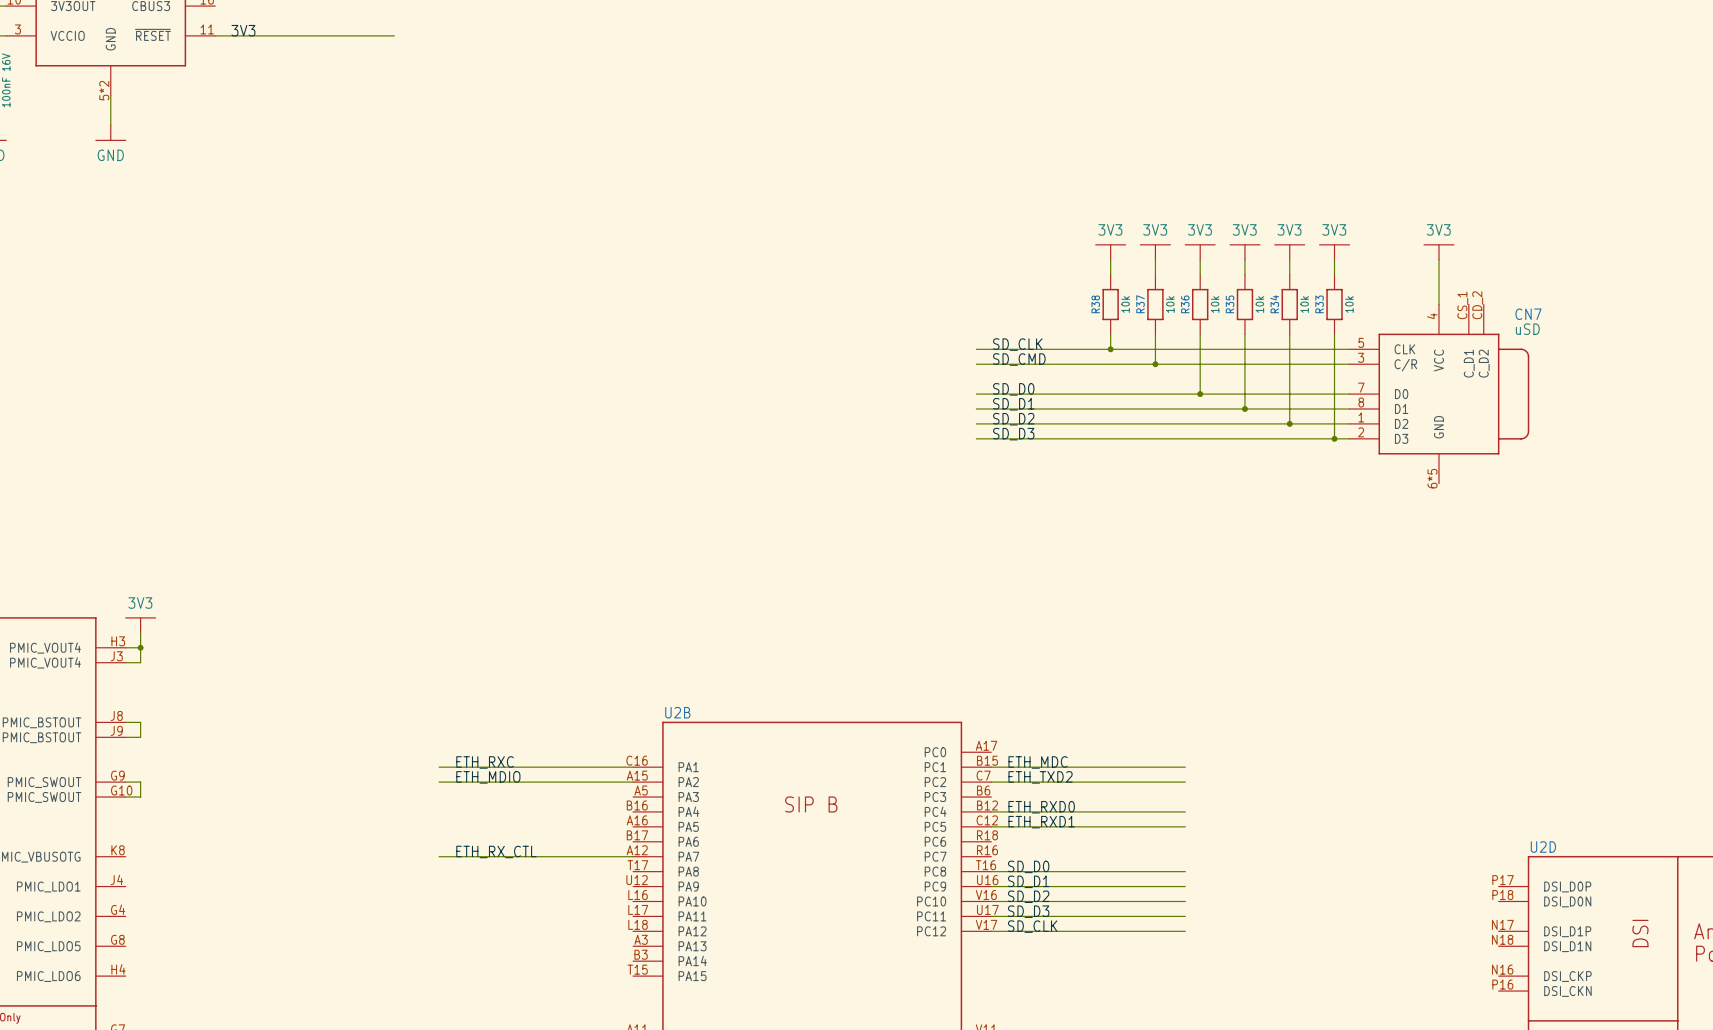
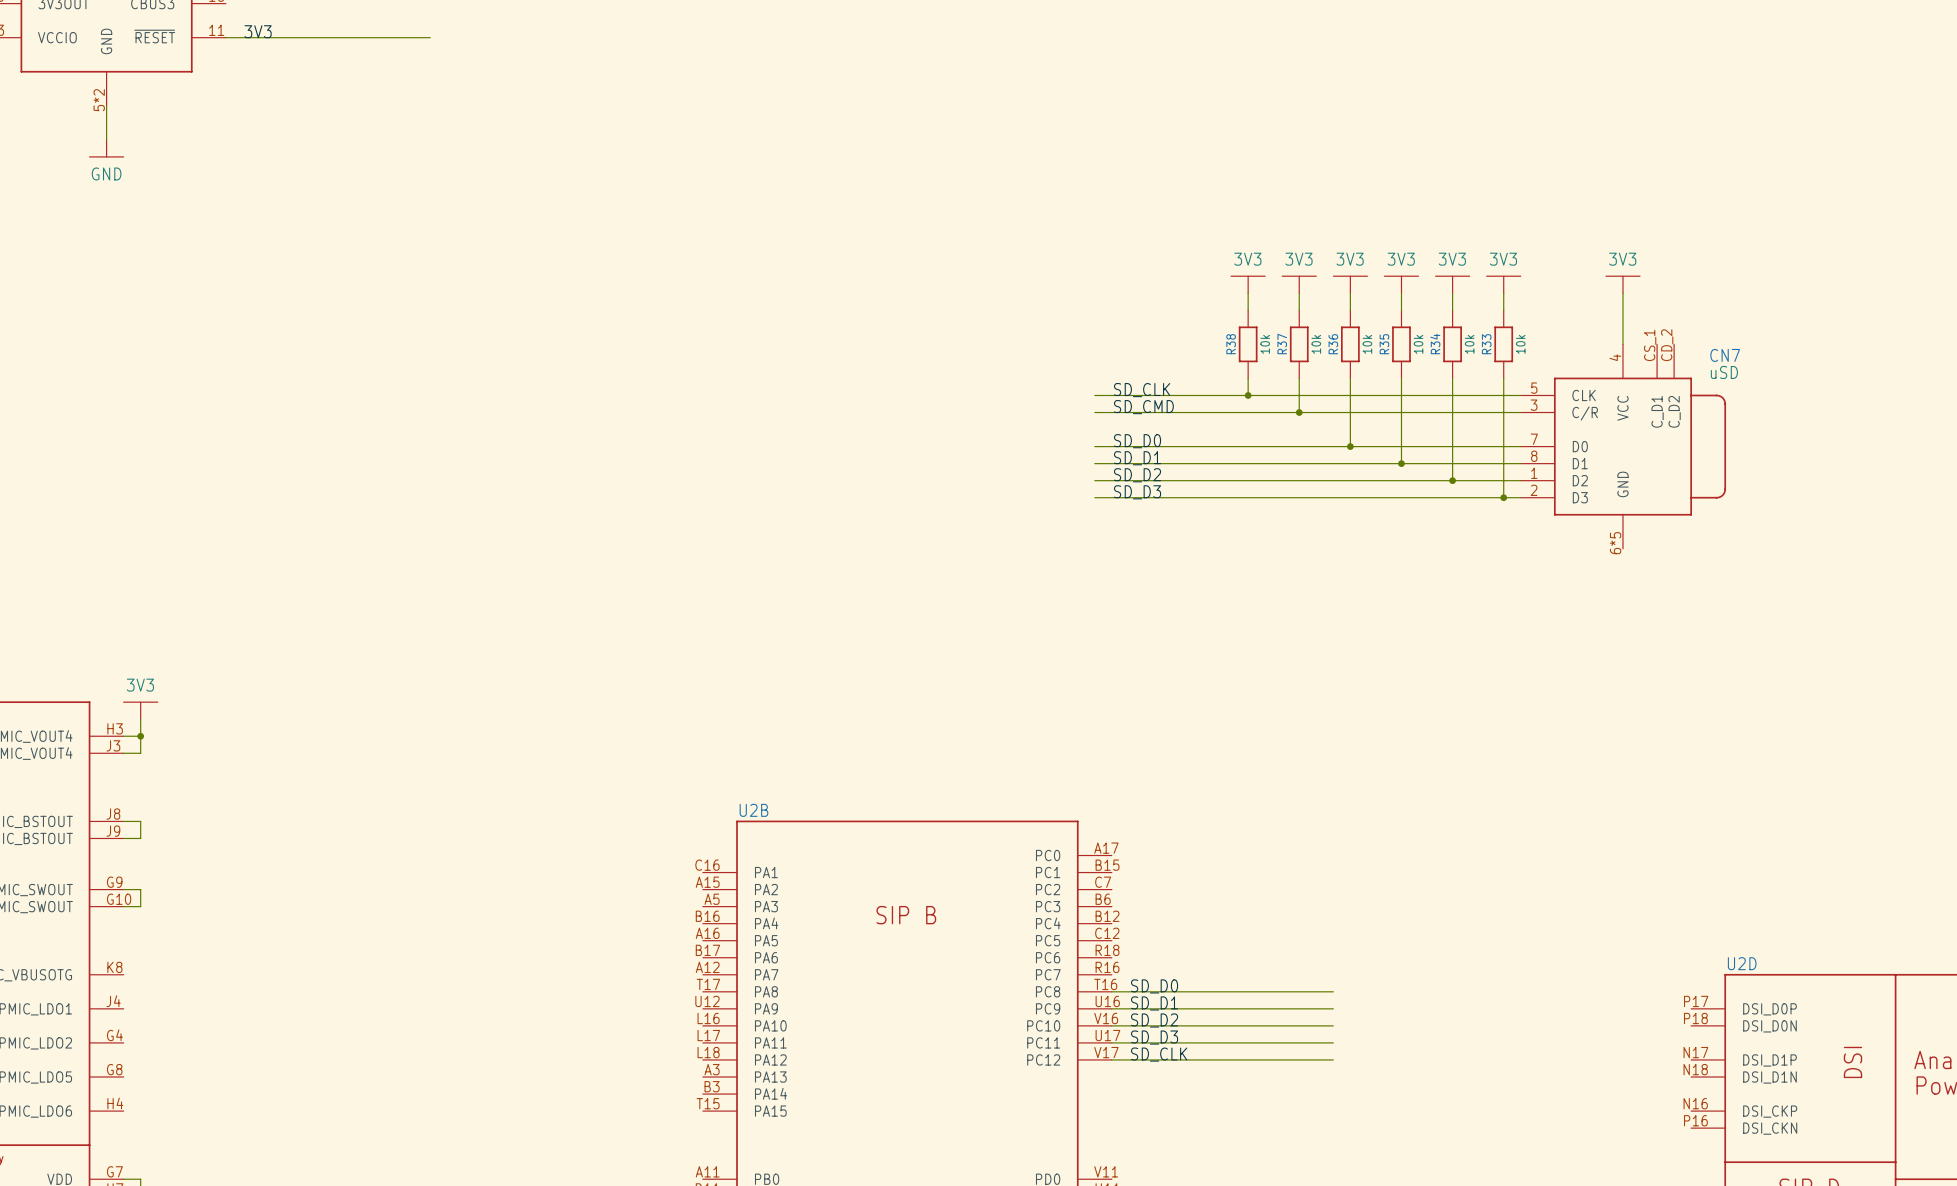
label: ETH_RXC (485, 762) -> none
label: ETH_MDC (1038, 762) -> none
wire: (439, 767) (633, 767) -> none
wire: (991, 767) (1185, 767) -> none
label: ETH_MDIO (488, 777) -> none
label: ETH_TXD2 (1040, 777) -> none
wire: (439, 782) (633, 782) -> none
wire: (991, 782) (1185, 782) -> none
label: ETH_RXD0 (1041, 807) -> none
wire: (991, 811) (1185, 811) -> none
label: ETH_RXD1 (1041, 822) -> none
wire: (991, 826) (1185, 826) -> none
label: ETH_RX_CTL (496, 851) -> none
wire: (439, 856) (633, 856) -> none

